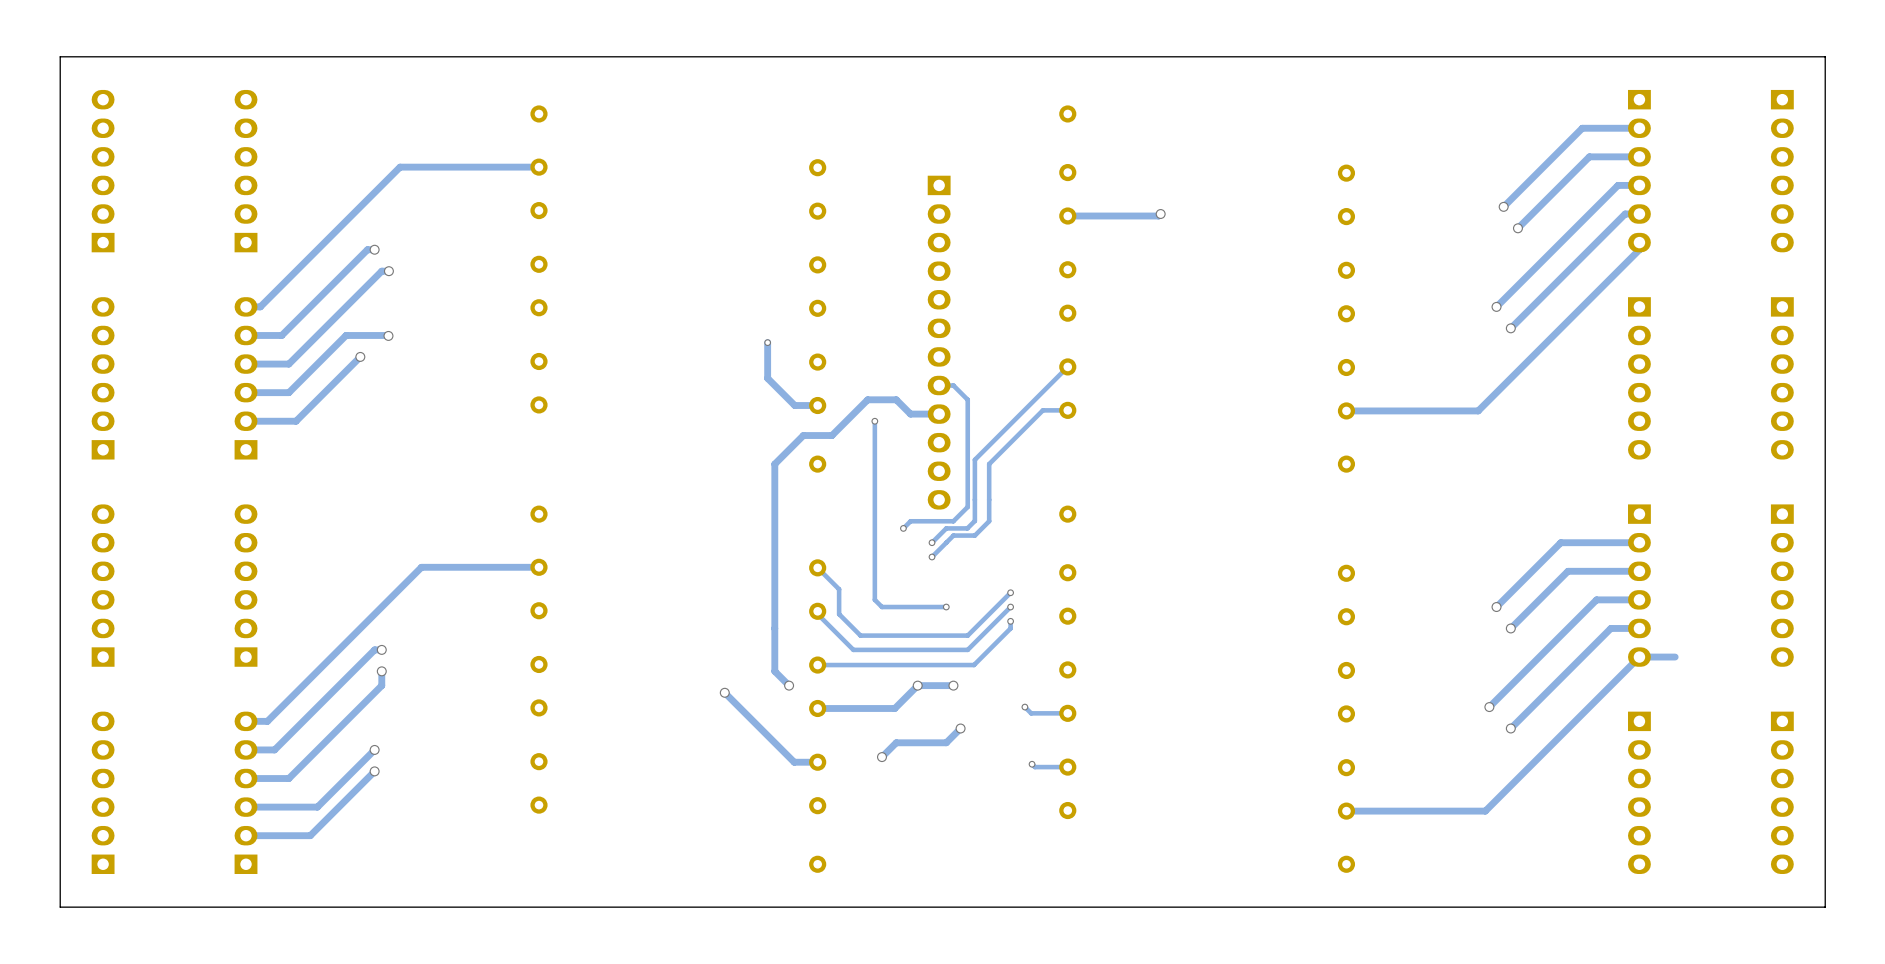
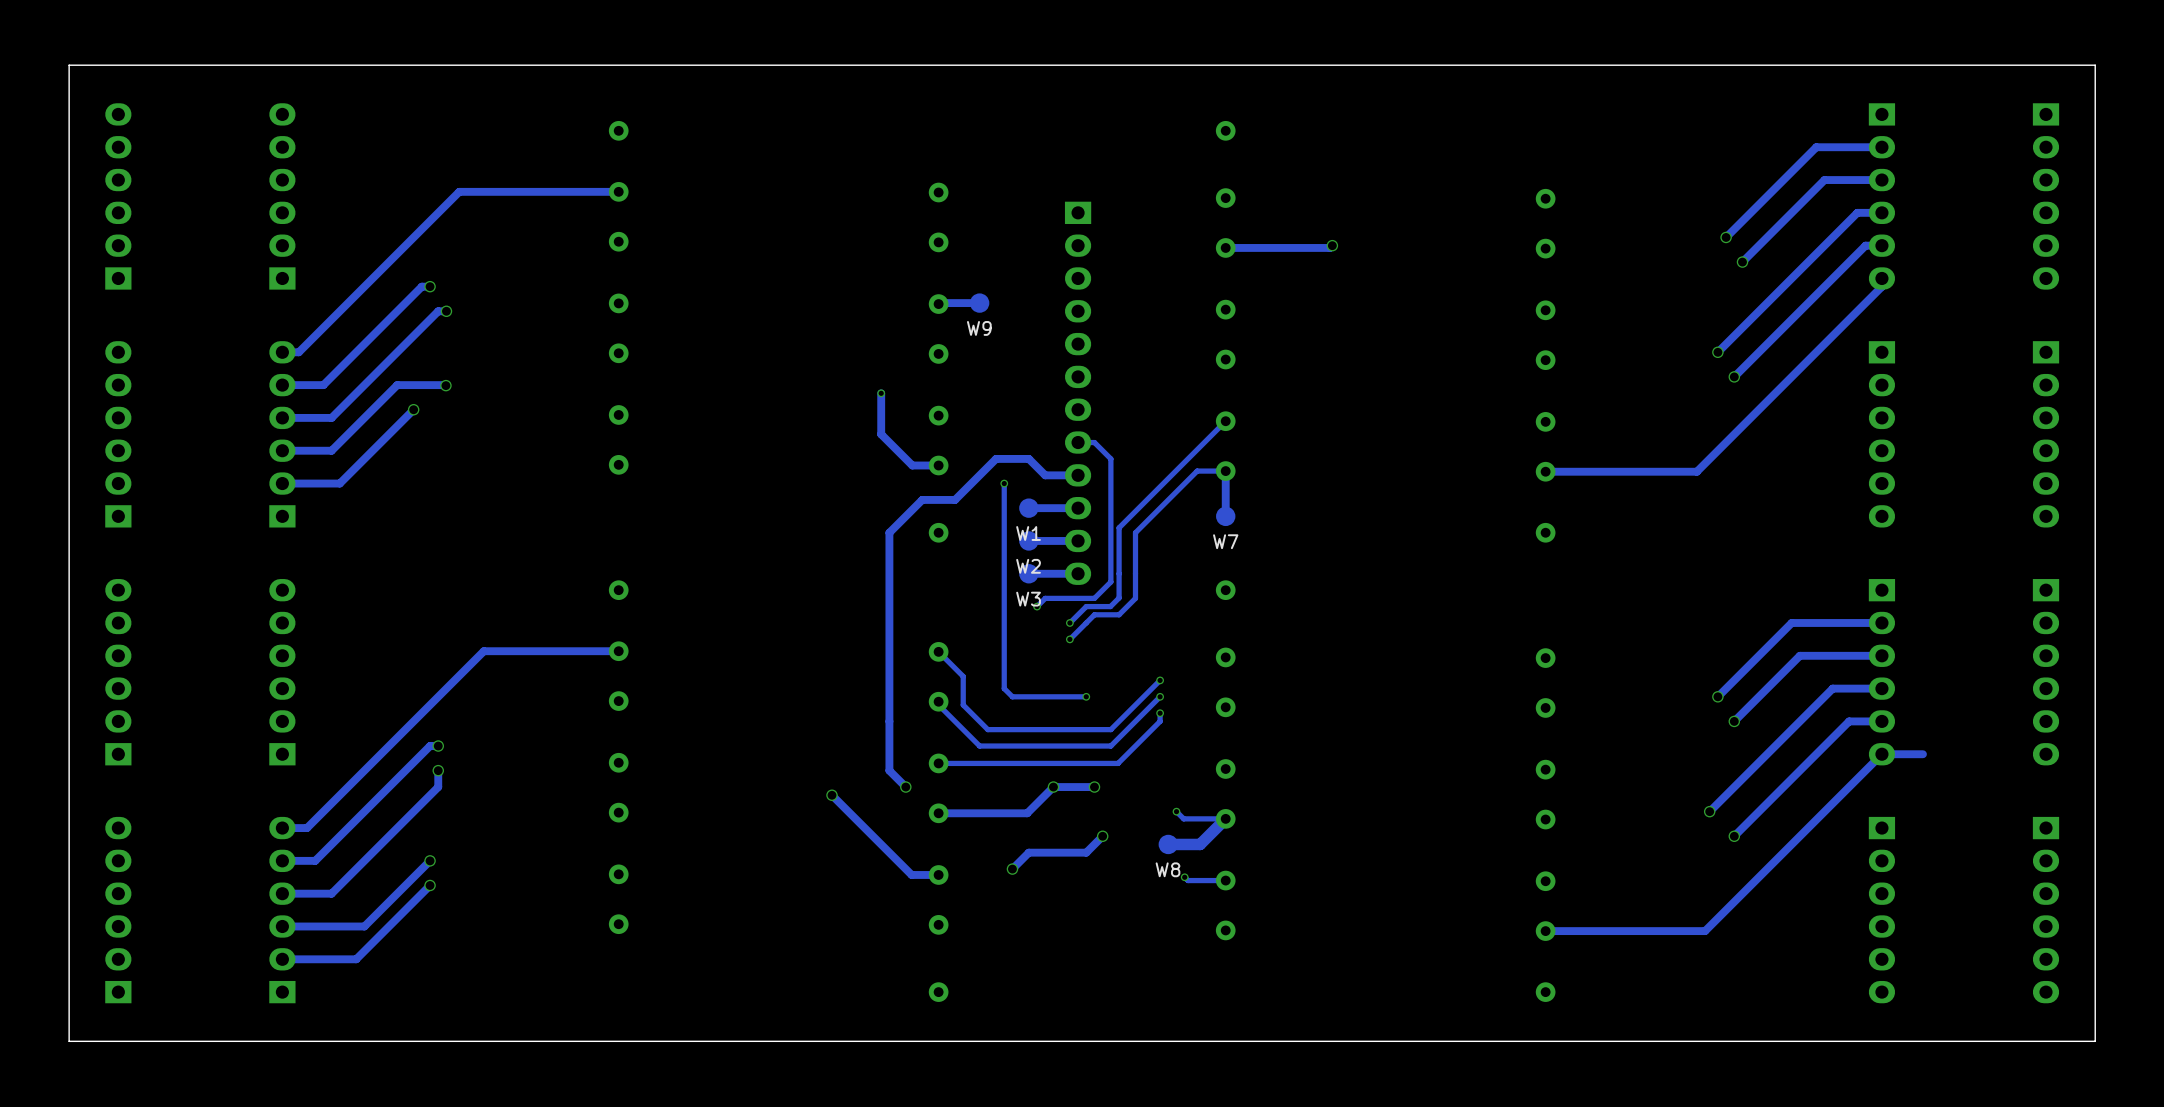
track: none -> (979, 303) (938, 304)
W9: none -> (979, 303)
track: none -> (1225, 471) (1225, 516)
W1: none -> (1028, 508)
track: none -> (1078, 508) (1028, 508)
W7: none -> (1225, 516)
W2: none -> (1028, 540)
track: none -> (1078, 540) (1028, 540)
W3: none -> (1028, 573)
track: none -> (1078, 573) (1028, 573)
track: none -> (1225, 818) (1200, 844) (1168, 844)
W8: none -> (1168, 844)

